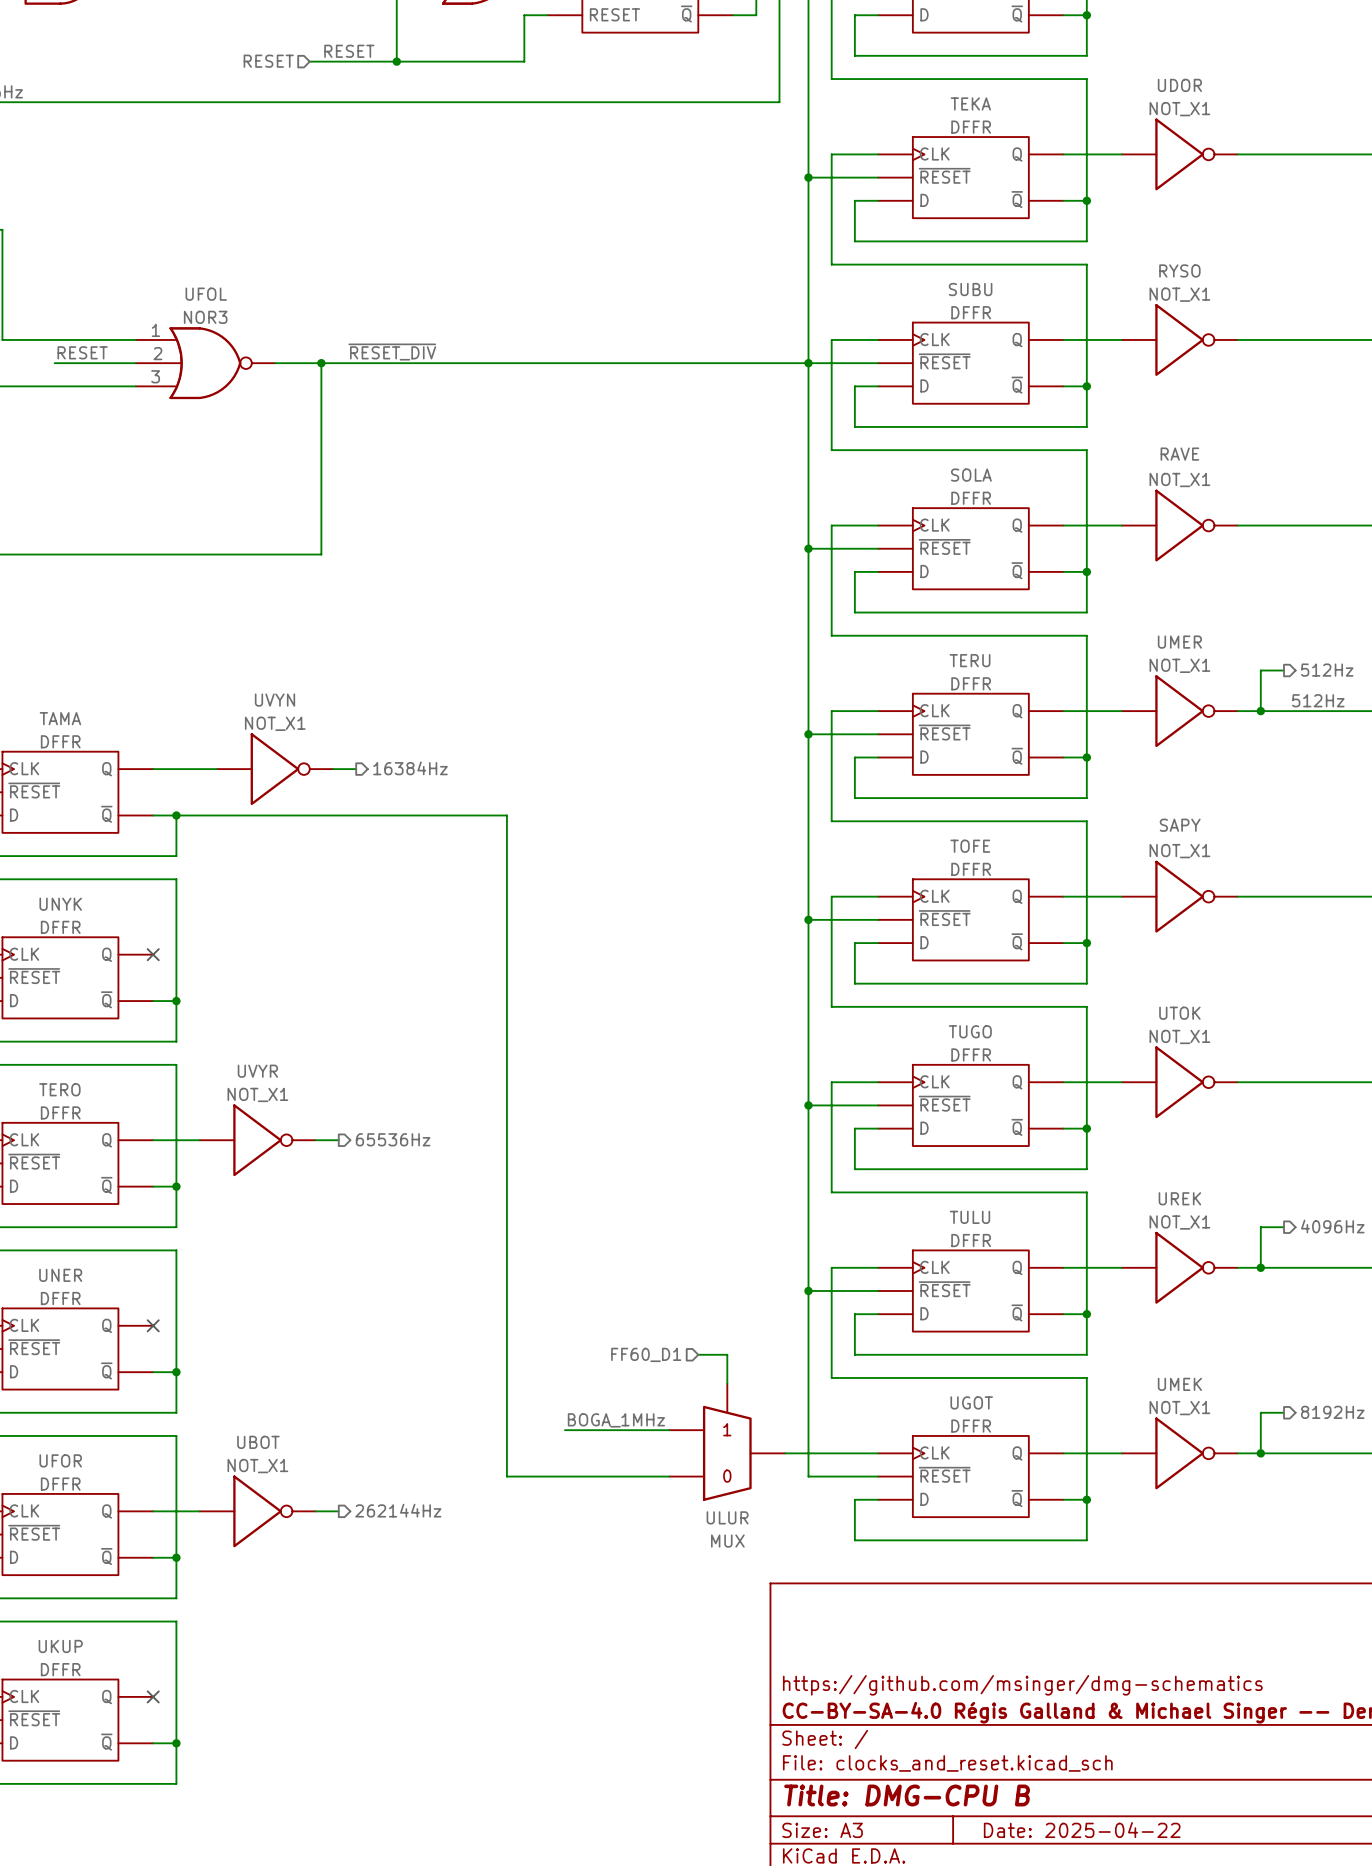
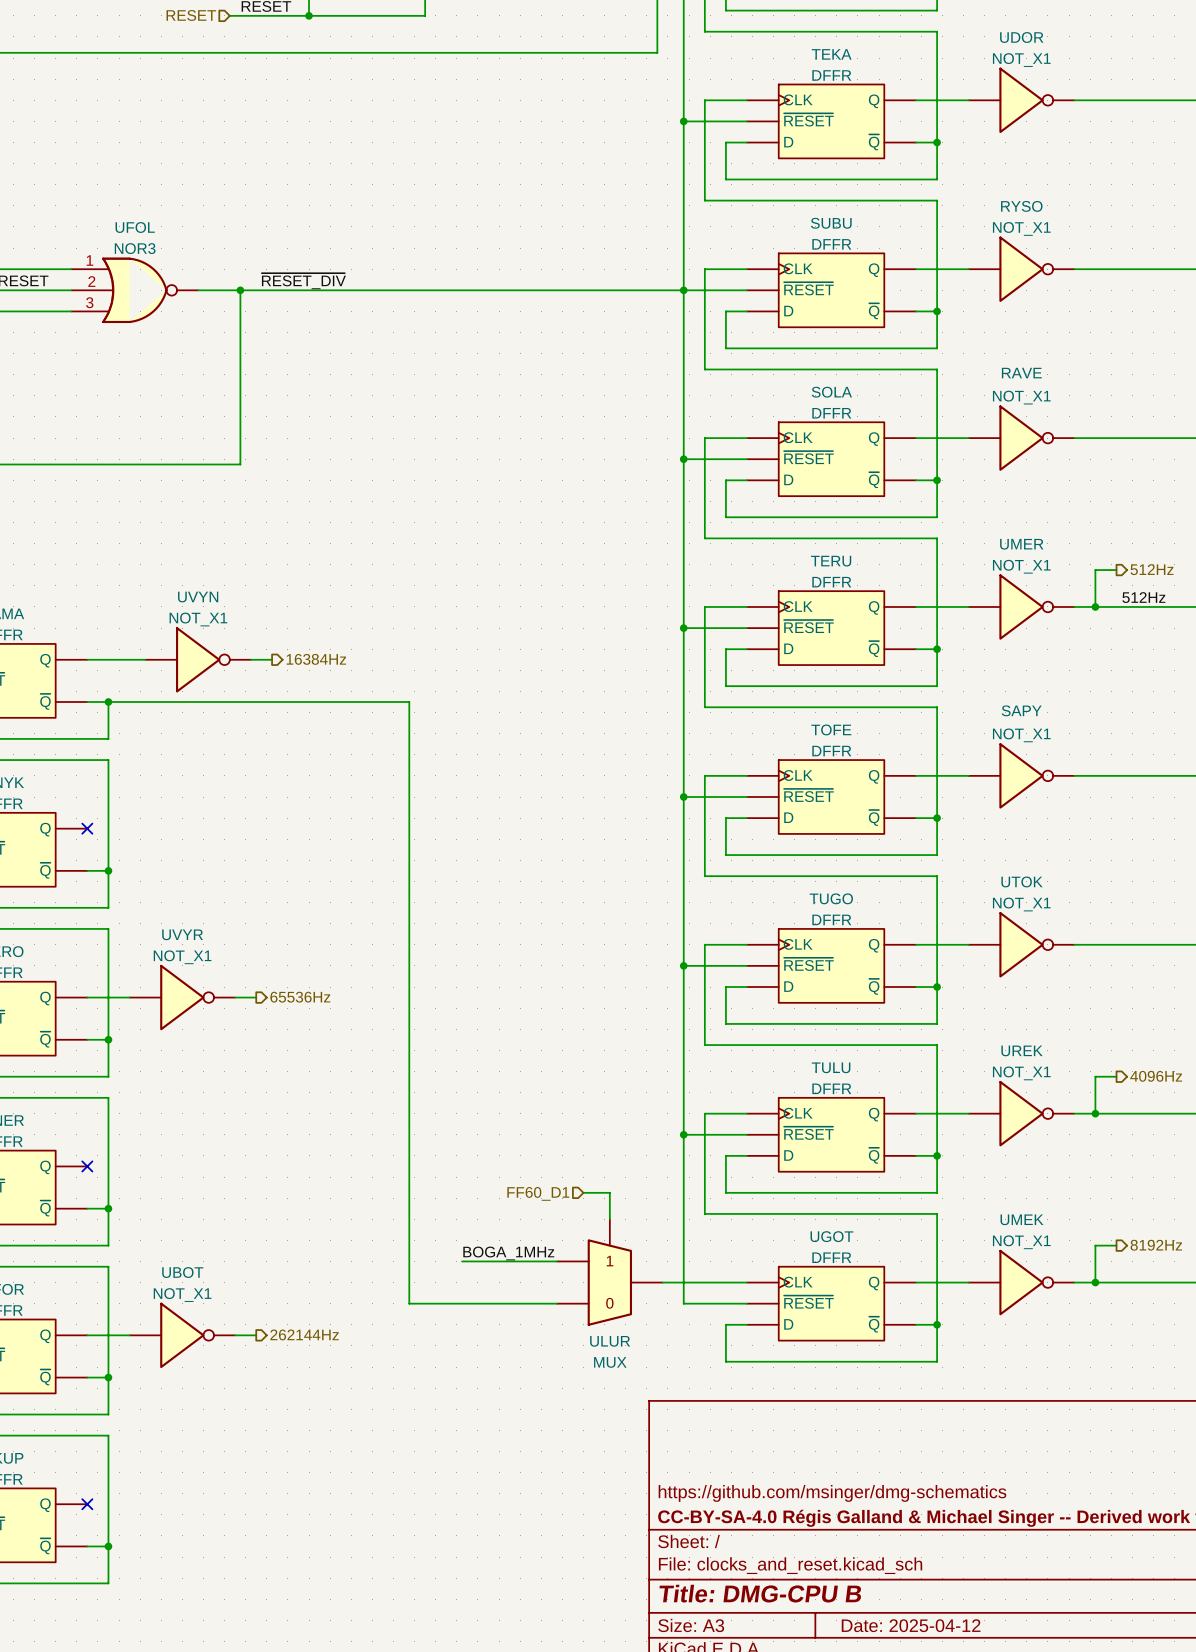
title block: Date: 2025-04-22 (1082, 1830) -> Date: 2025-04-12 (911, 1625)

